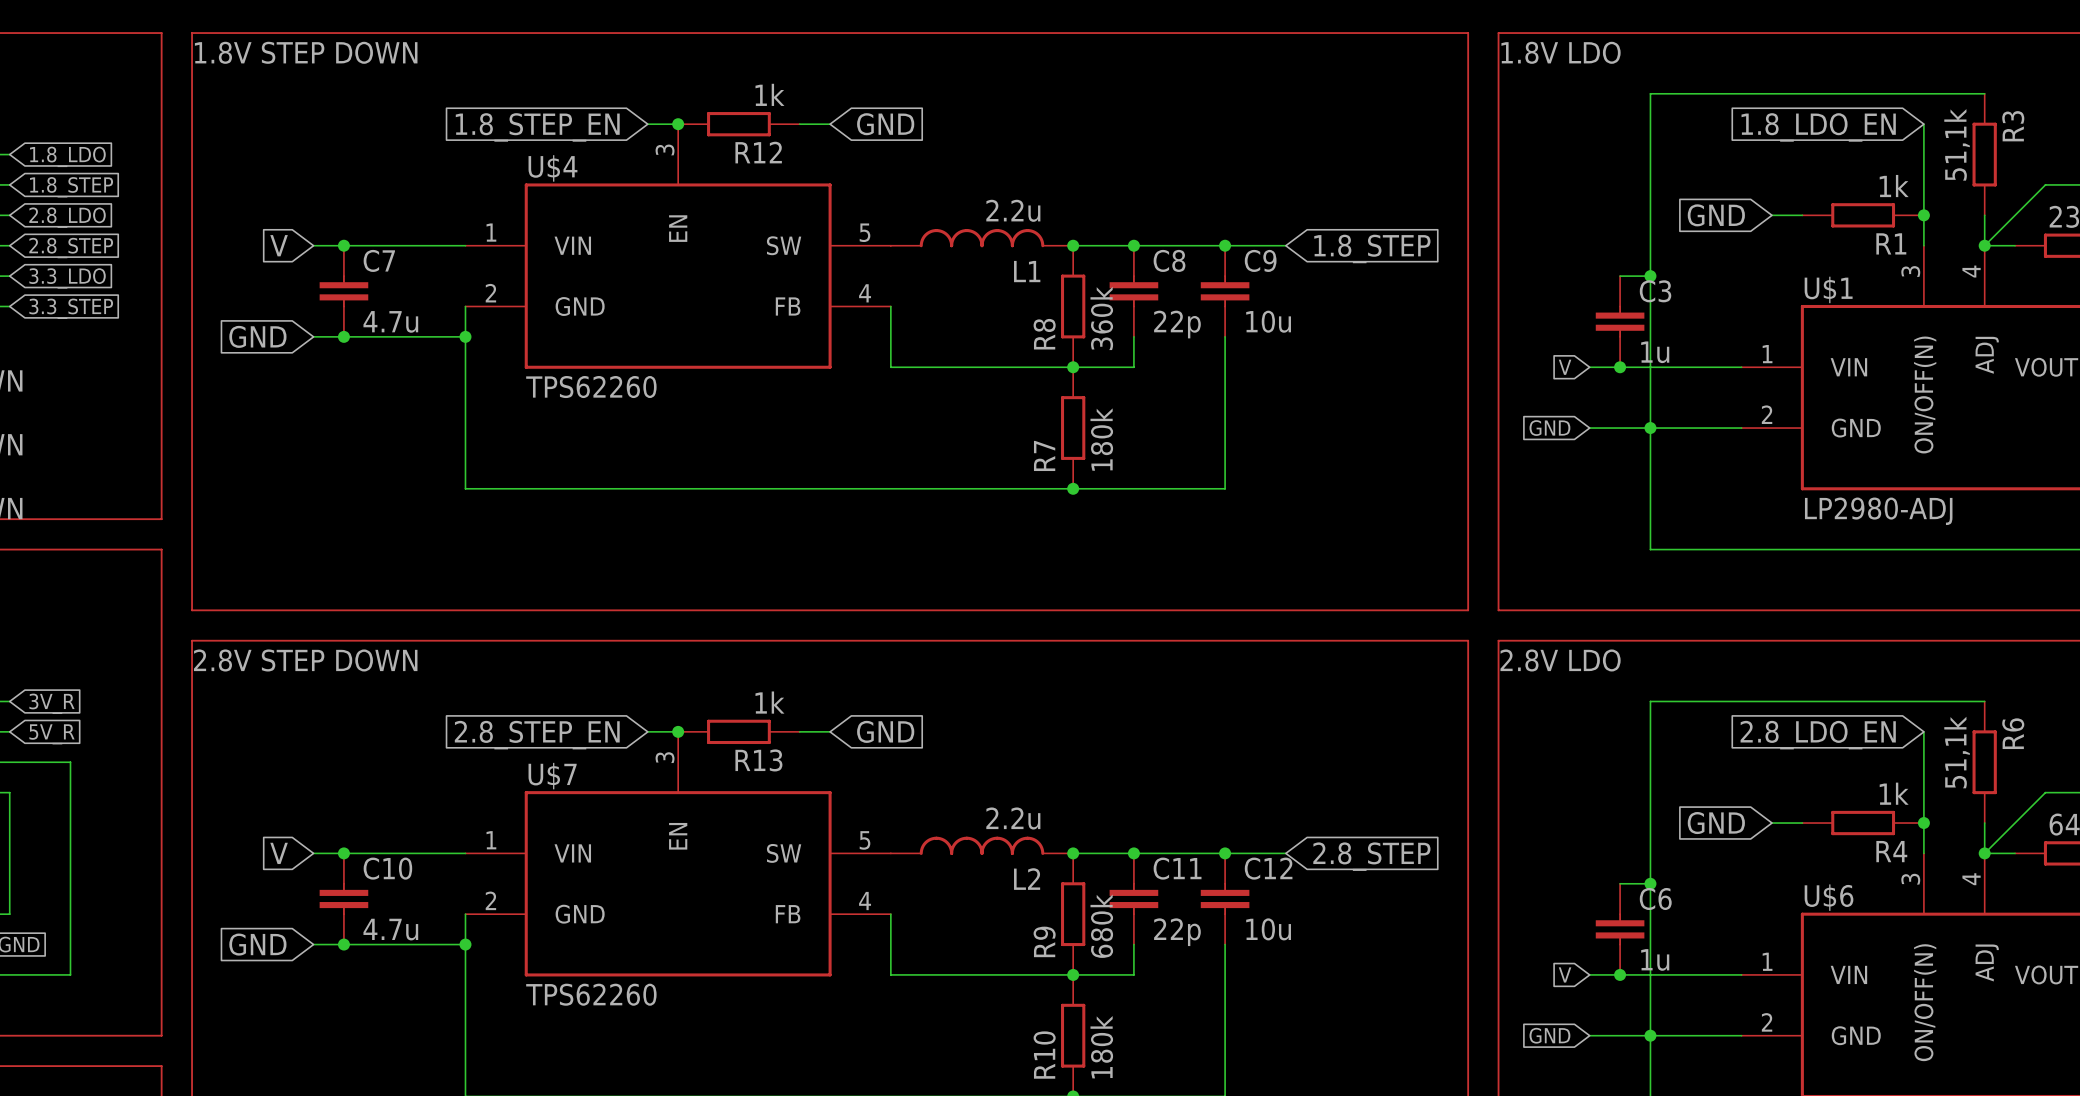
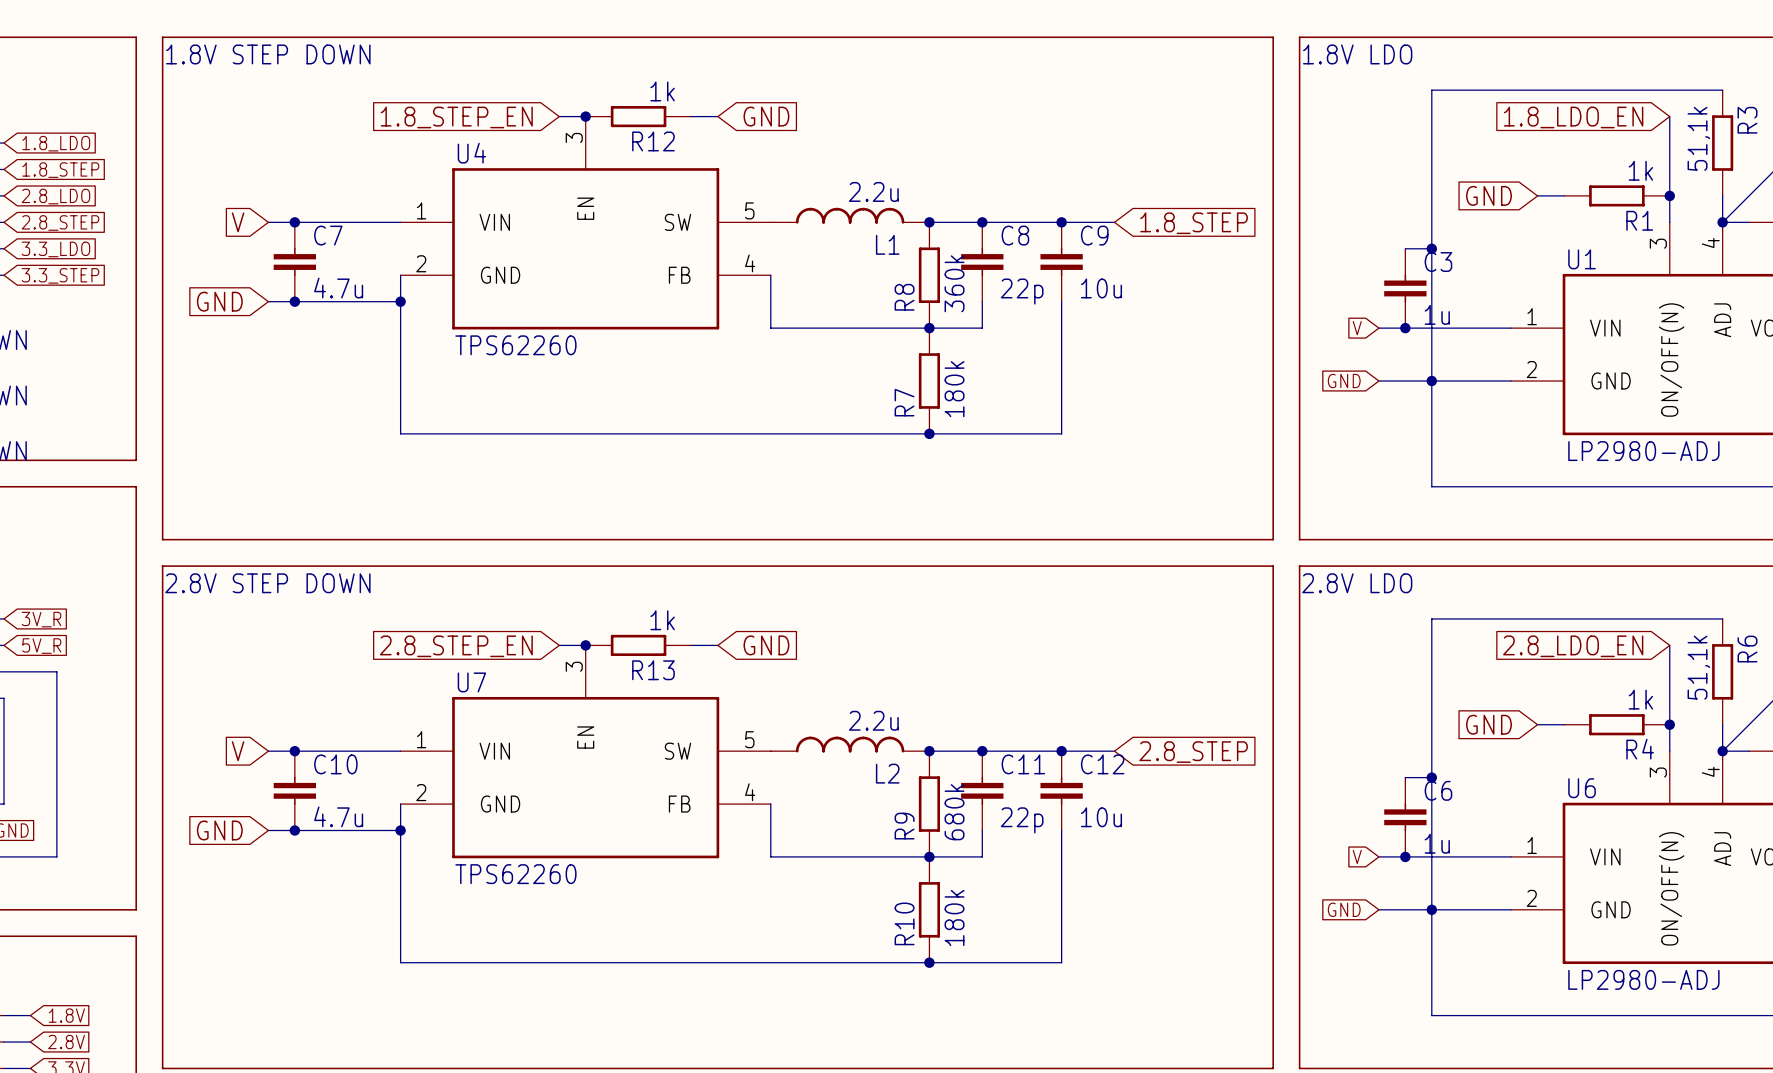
U$4 name: U$4 (552, 168) -> U4 (471, 153)
U$1 name: U$1 (1828, 289) -> U1 (1582, 259)
U$7 name: U$7 (552, 776) -> U7 (471, 682)
U$6 name: U$6 (1829, 897) -> U6 (1582, 788)

